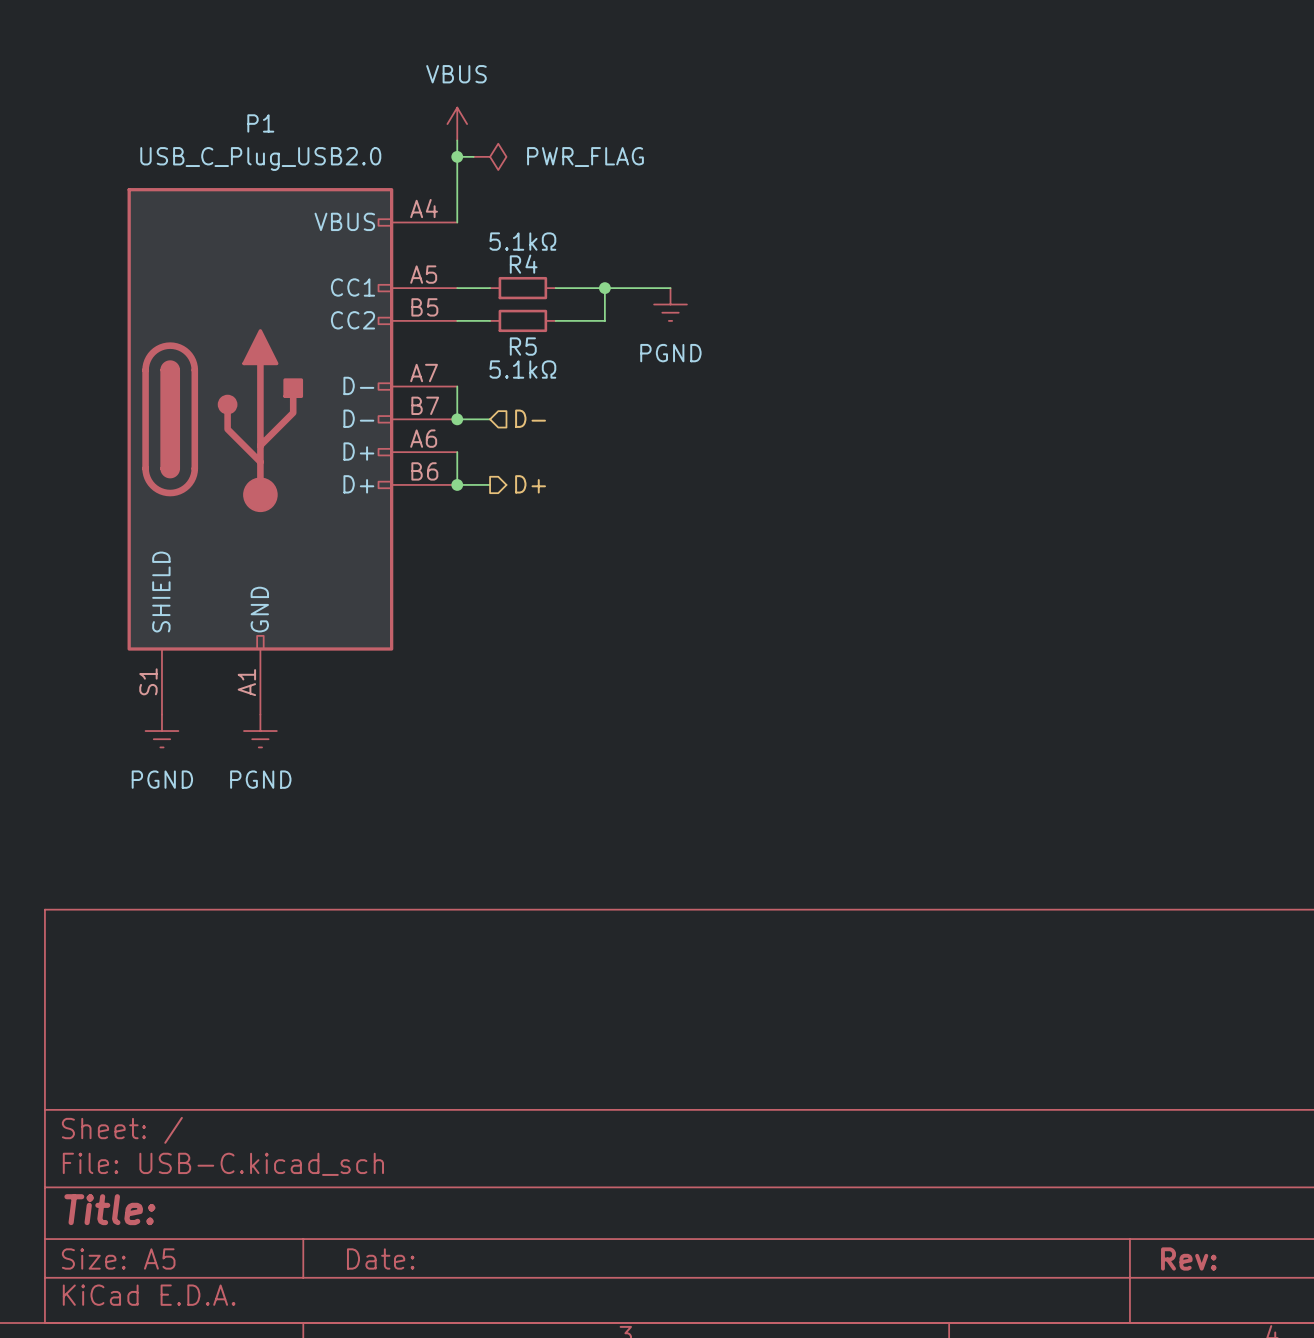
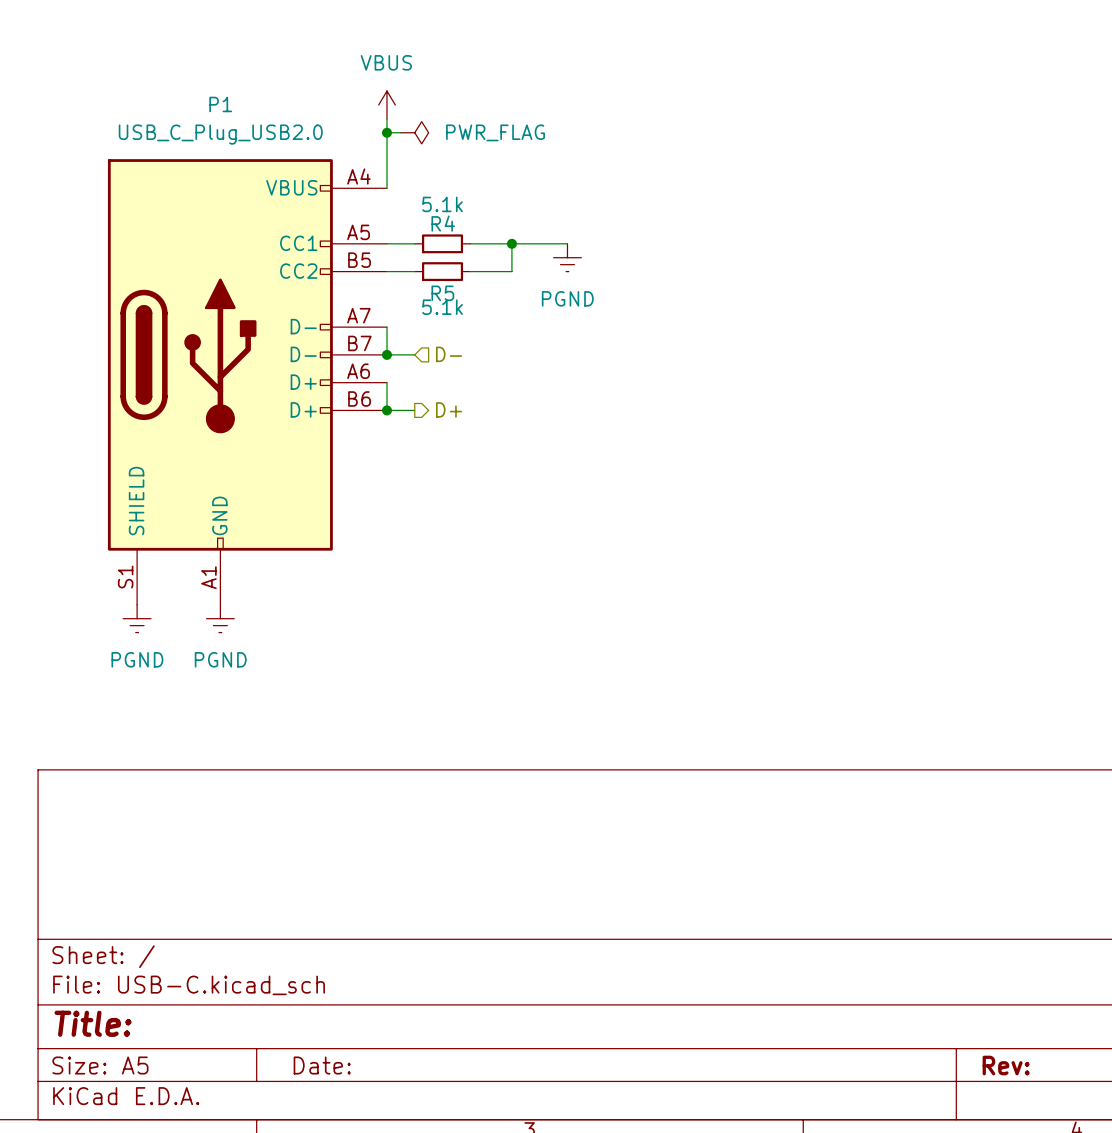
R4 value: 5.1kΩ (522, 241) -> 5.1k (442, 204)
R5 value: 5.1kΩ (522, 369) -> 5.1k (442, 307)

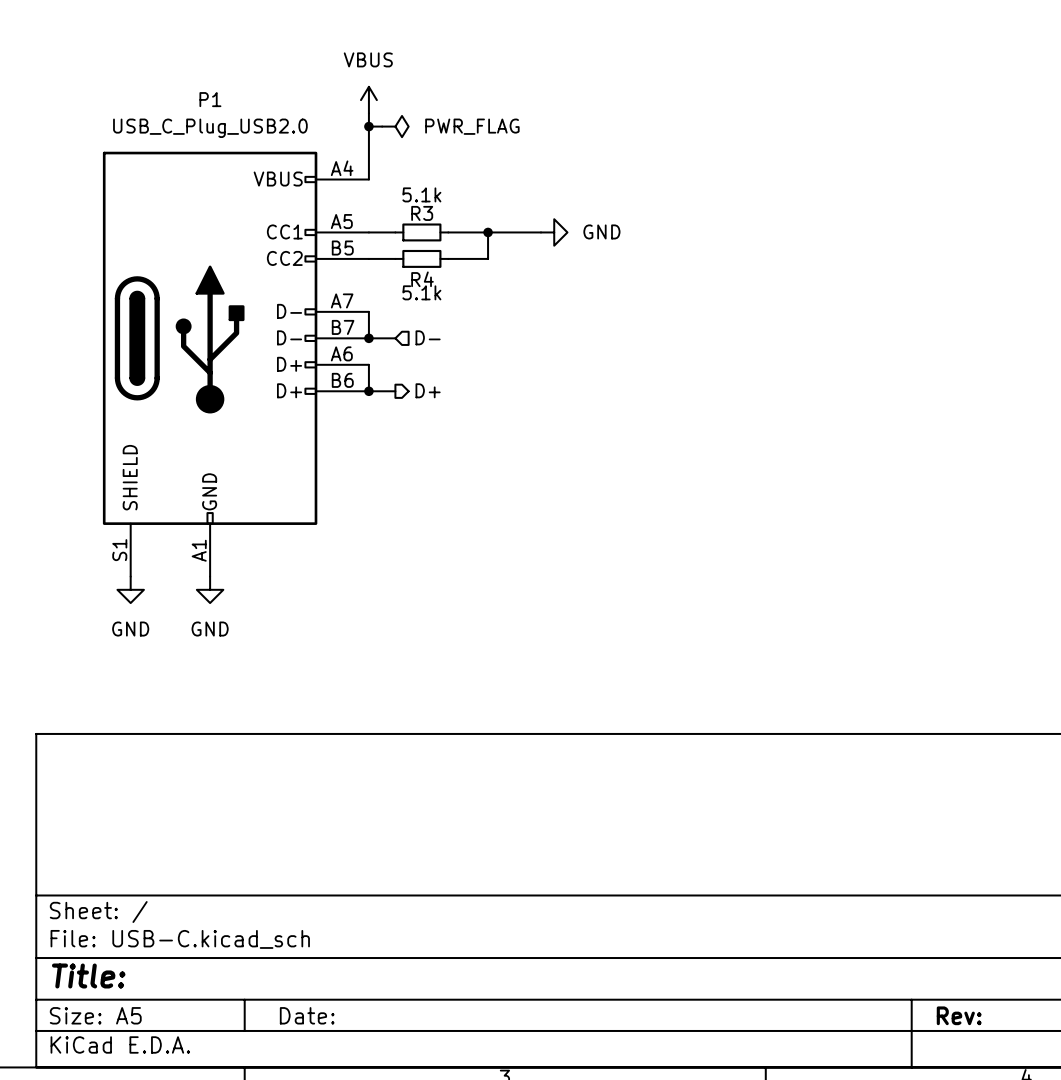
R4 name: R4 (443, 223) -> R3 (422, 213)
power symbol: none -> GND (554, 232)
power symbol: PGND (567, 257) -> none
R5 name: R5 (442, 293) -> R4 (422, 279)
power symbol: PGND (137, 618) -> GND (130, 589)
power symbol: PGND (220, 618) -> GND (210, 589)

